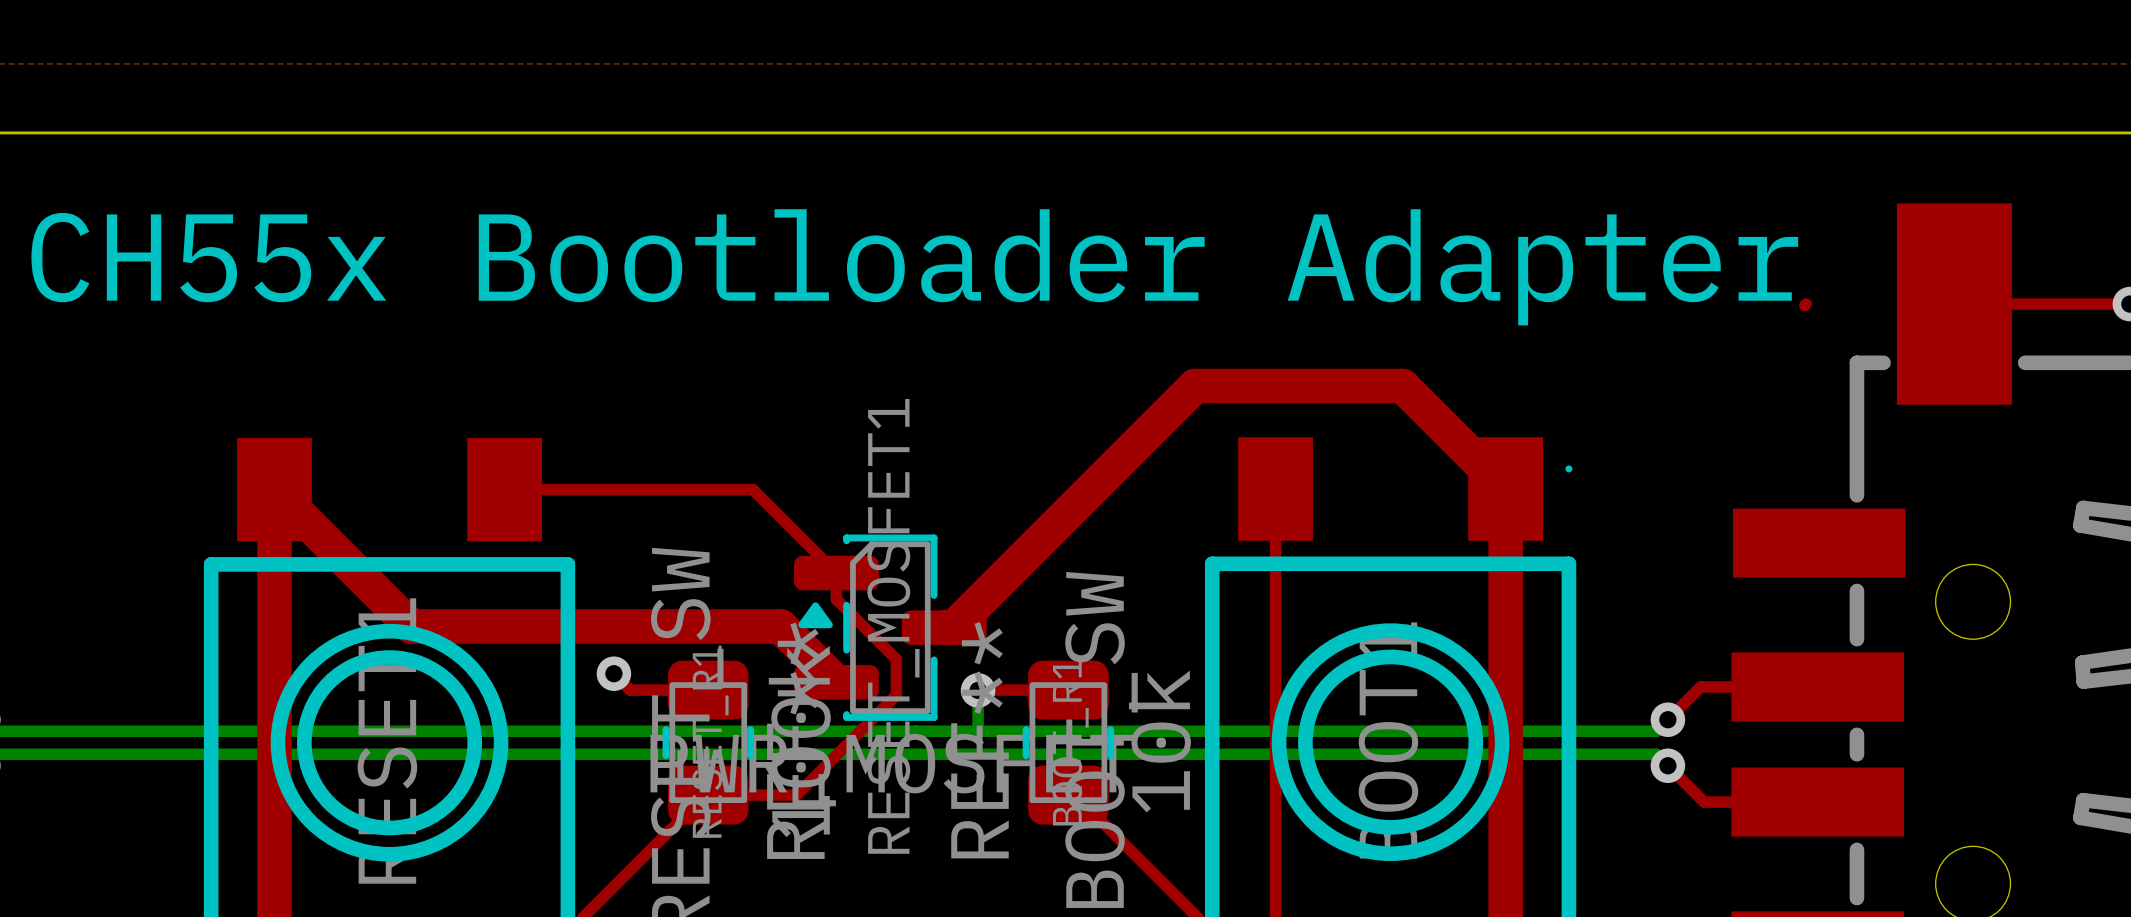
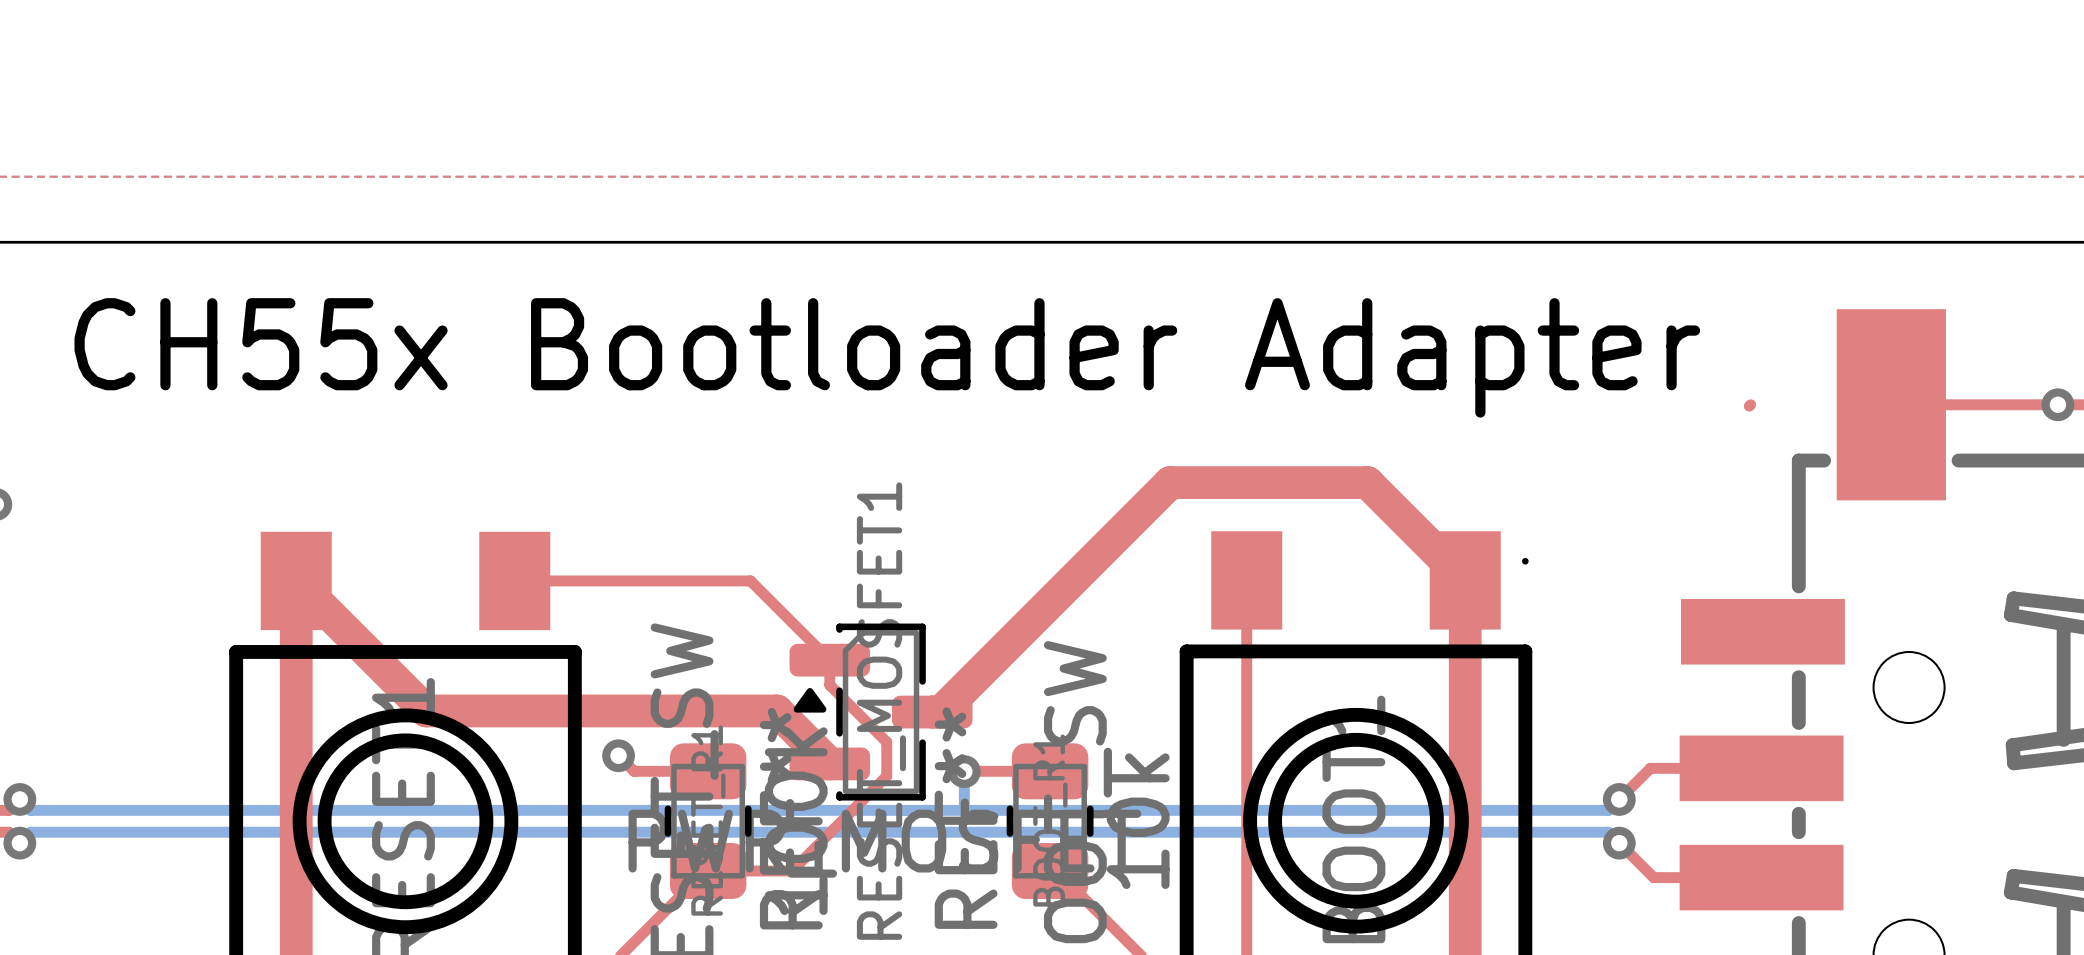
text position: CH55x Bootloader Adapter (914, 267) -> CH55x Bootloader Adapter (887, 357)

